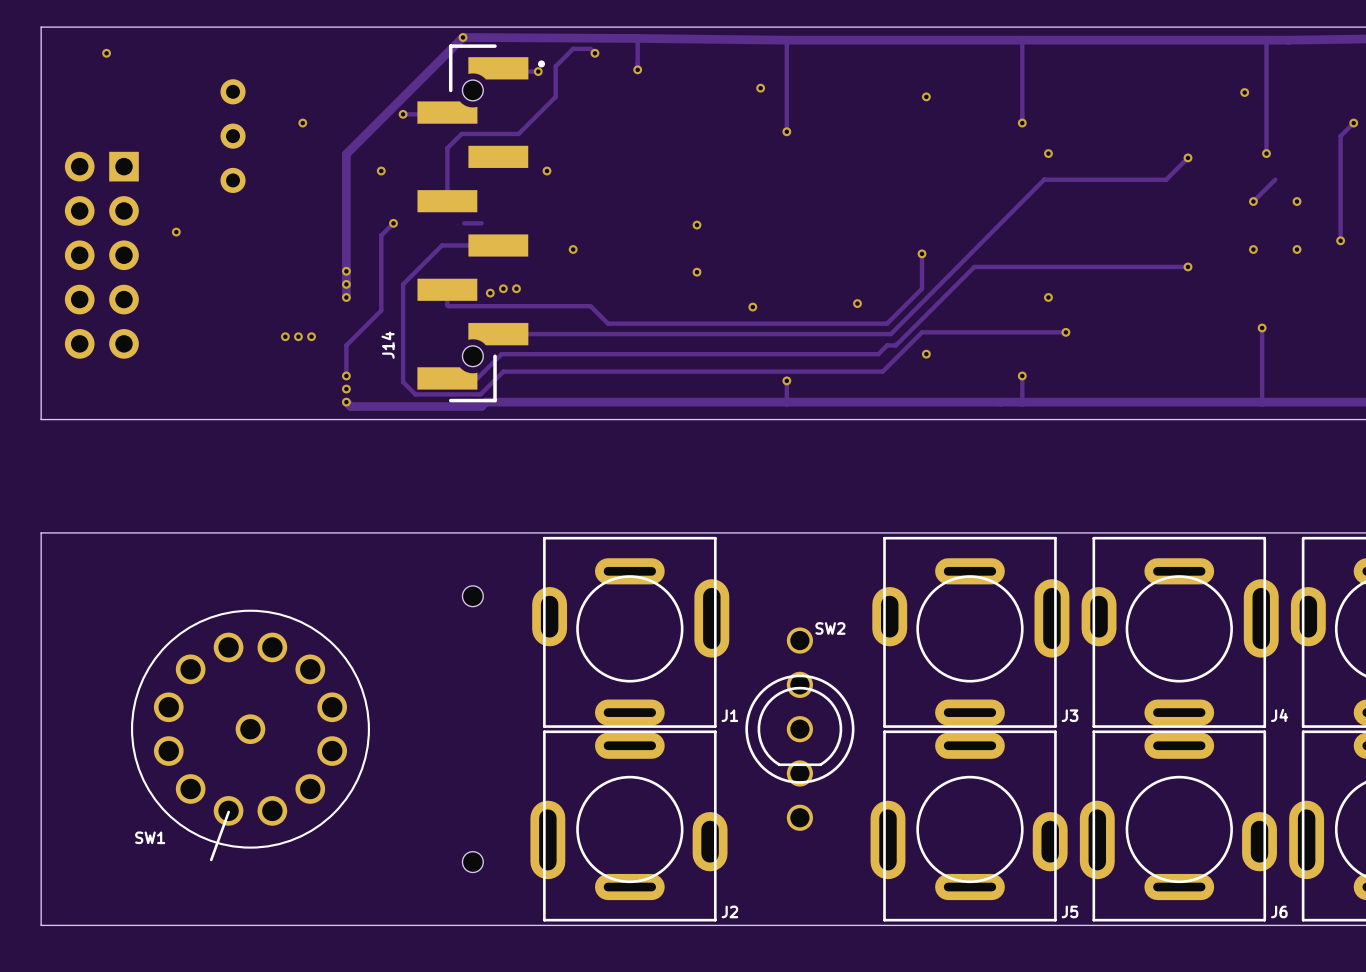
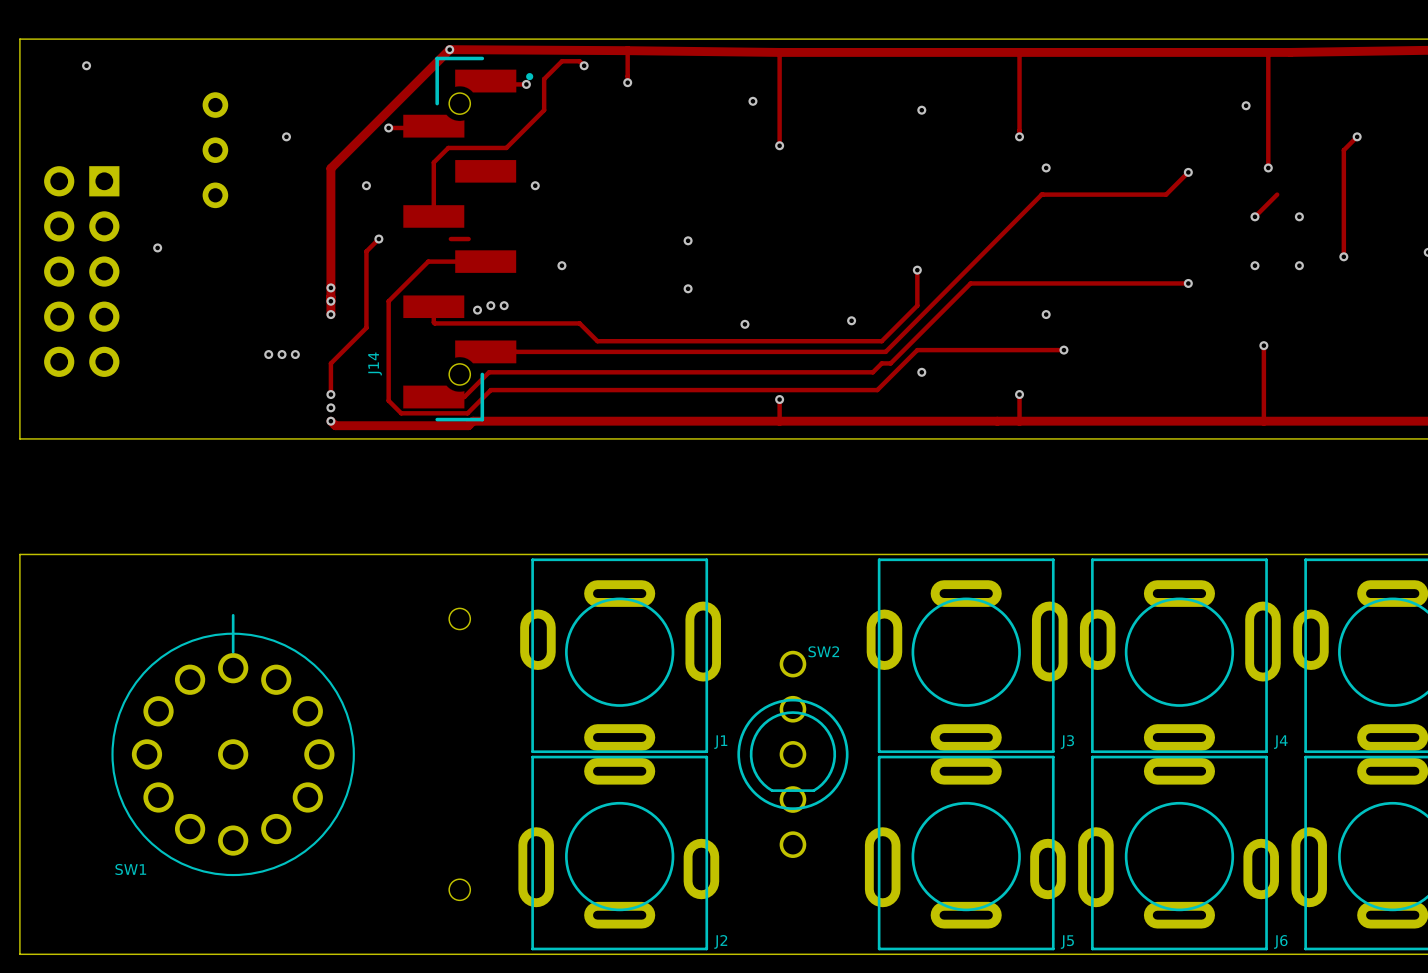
SW1 footprint: [130, 609, 370, 862] -> [111, 613, 355, 877]

